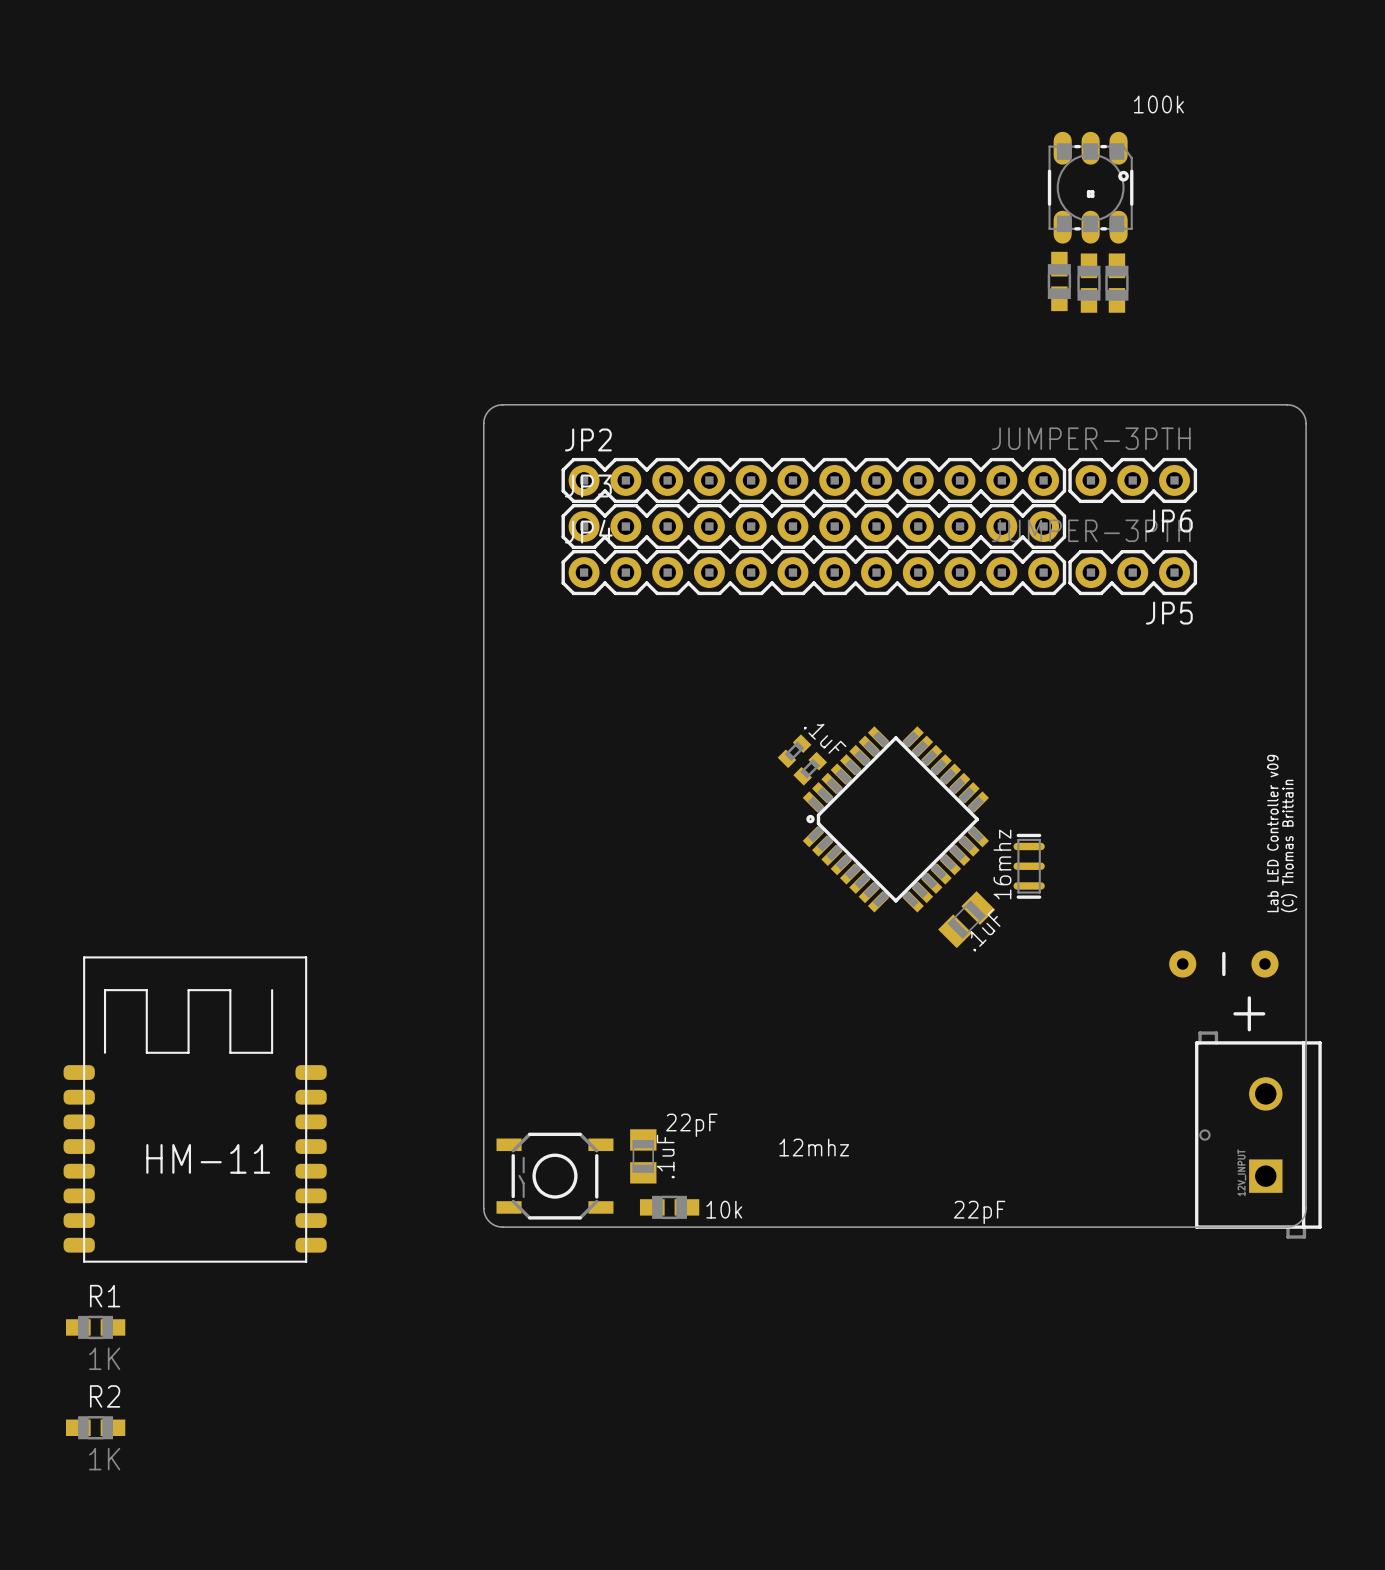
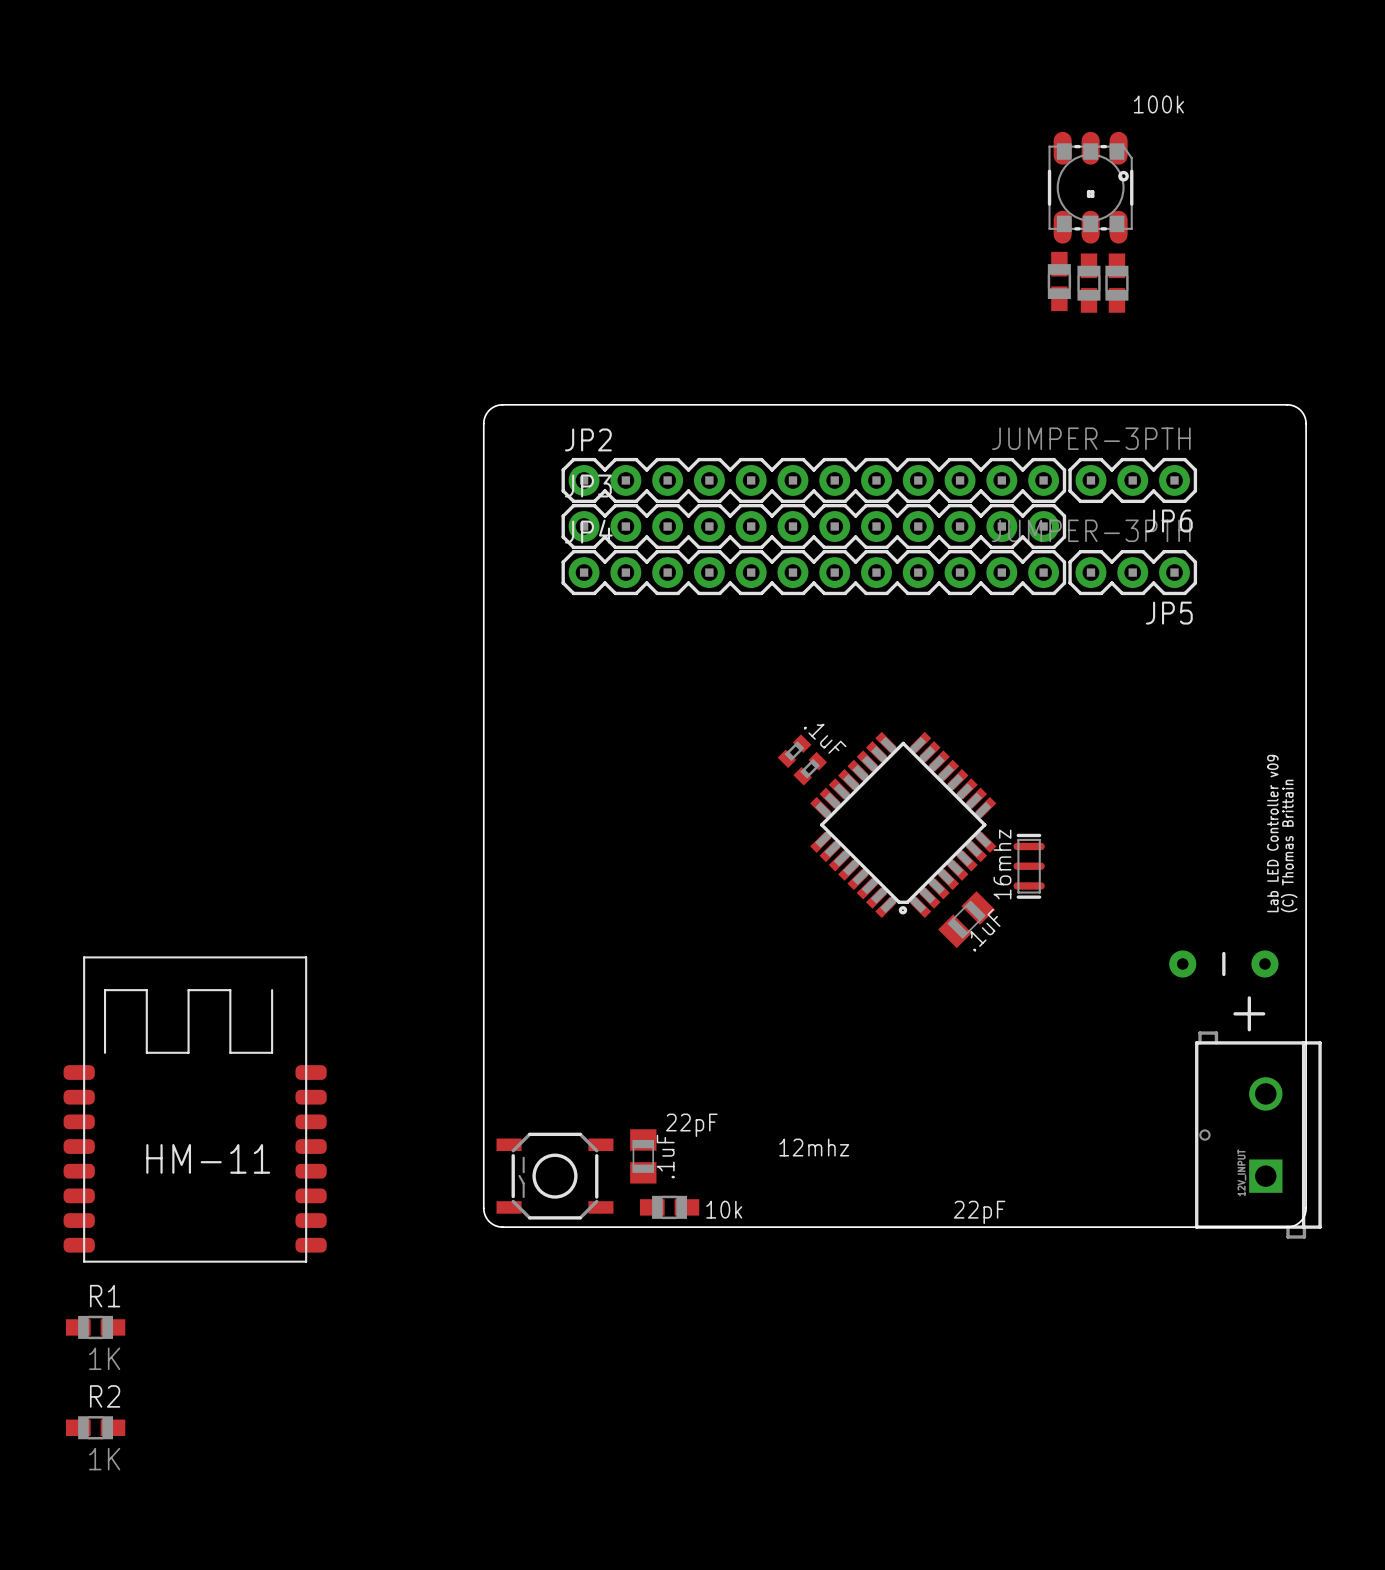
part rotation: 0° (895, 819) -> 90° counterclockwise (903, 824)

